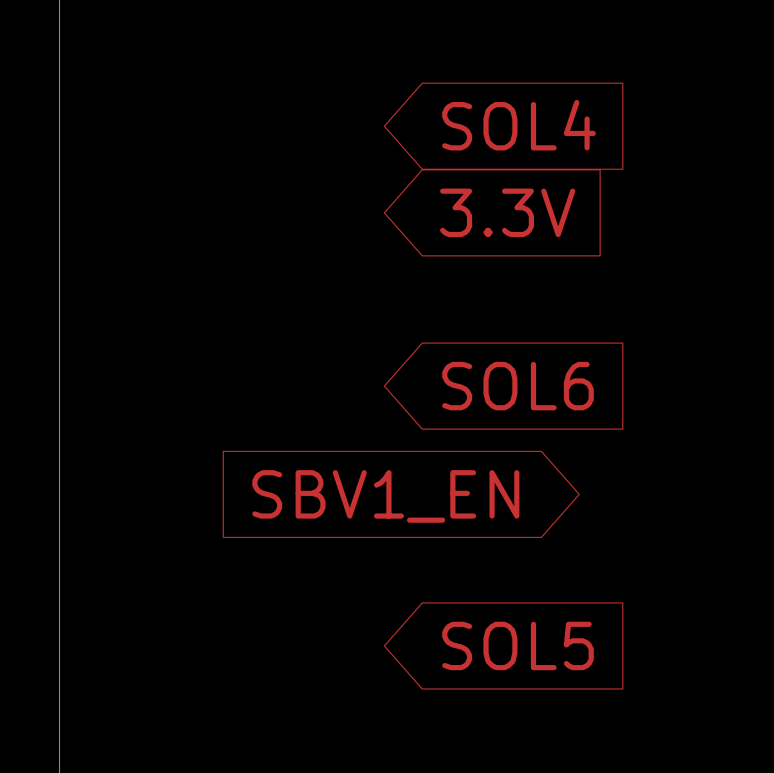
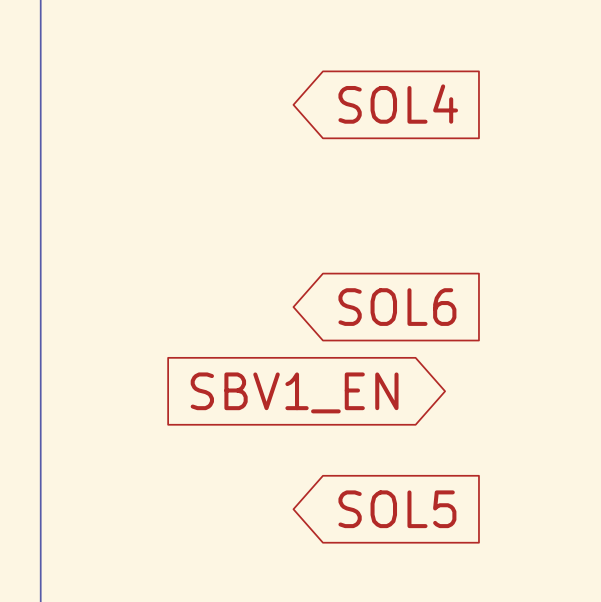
global label: 3.3V (507, 212) -> none

